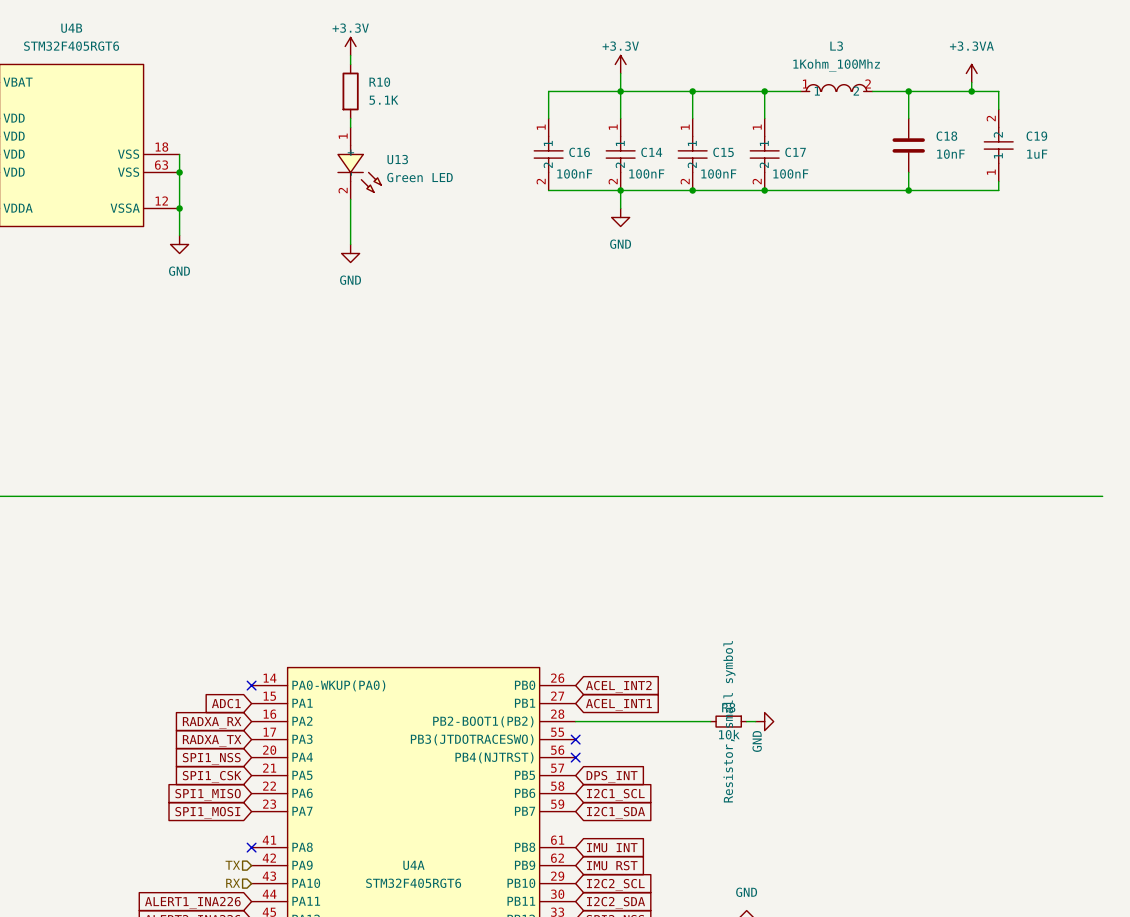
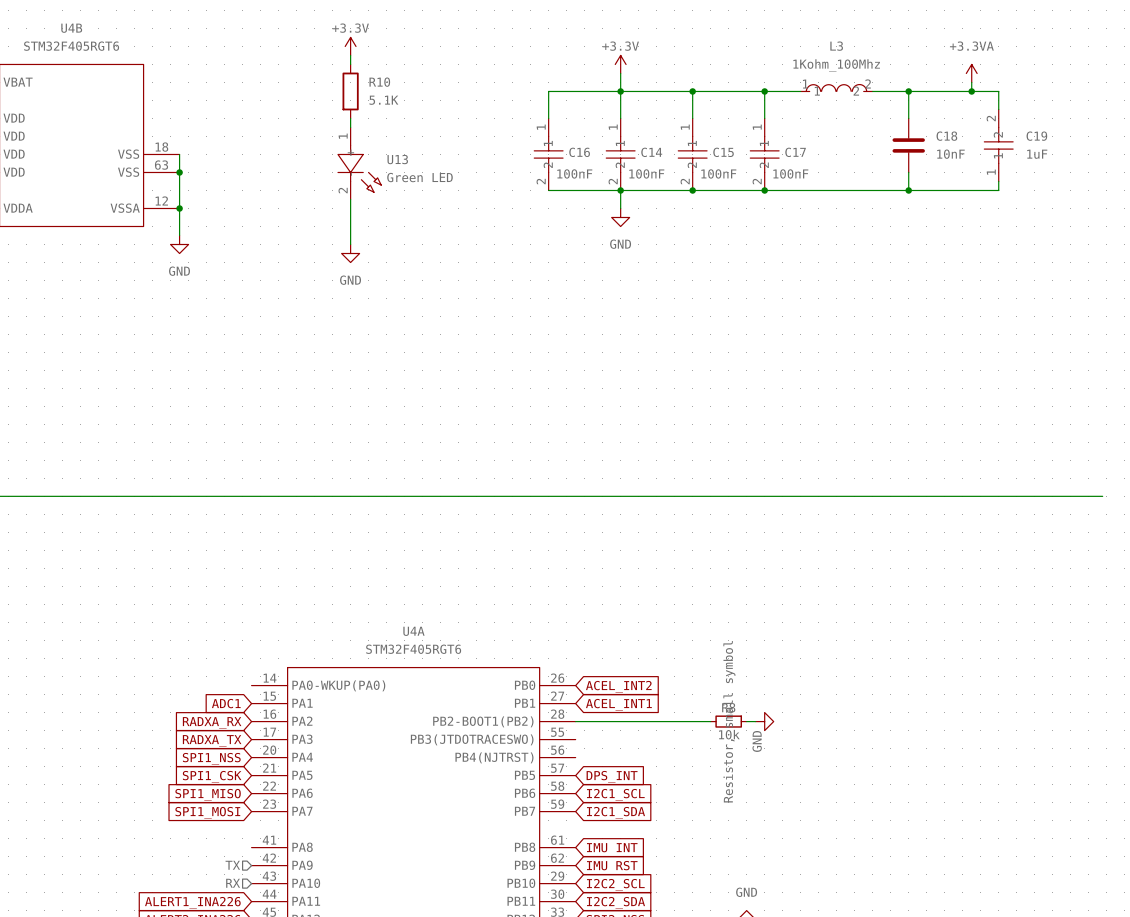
no-connect mark: (251, 685) -> none
no-connect mark: (575, 739) -> none
no-connect mark: (575, 757) -> none
no-connect mark: (251, 847) -> none
U4A name position: U4A (413, 865) -> U4A (413, 631)
U4A value position: STM32F405RGT6 (413, 883) -> STM32F405RGT6 (413, 649)

